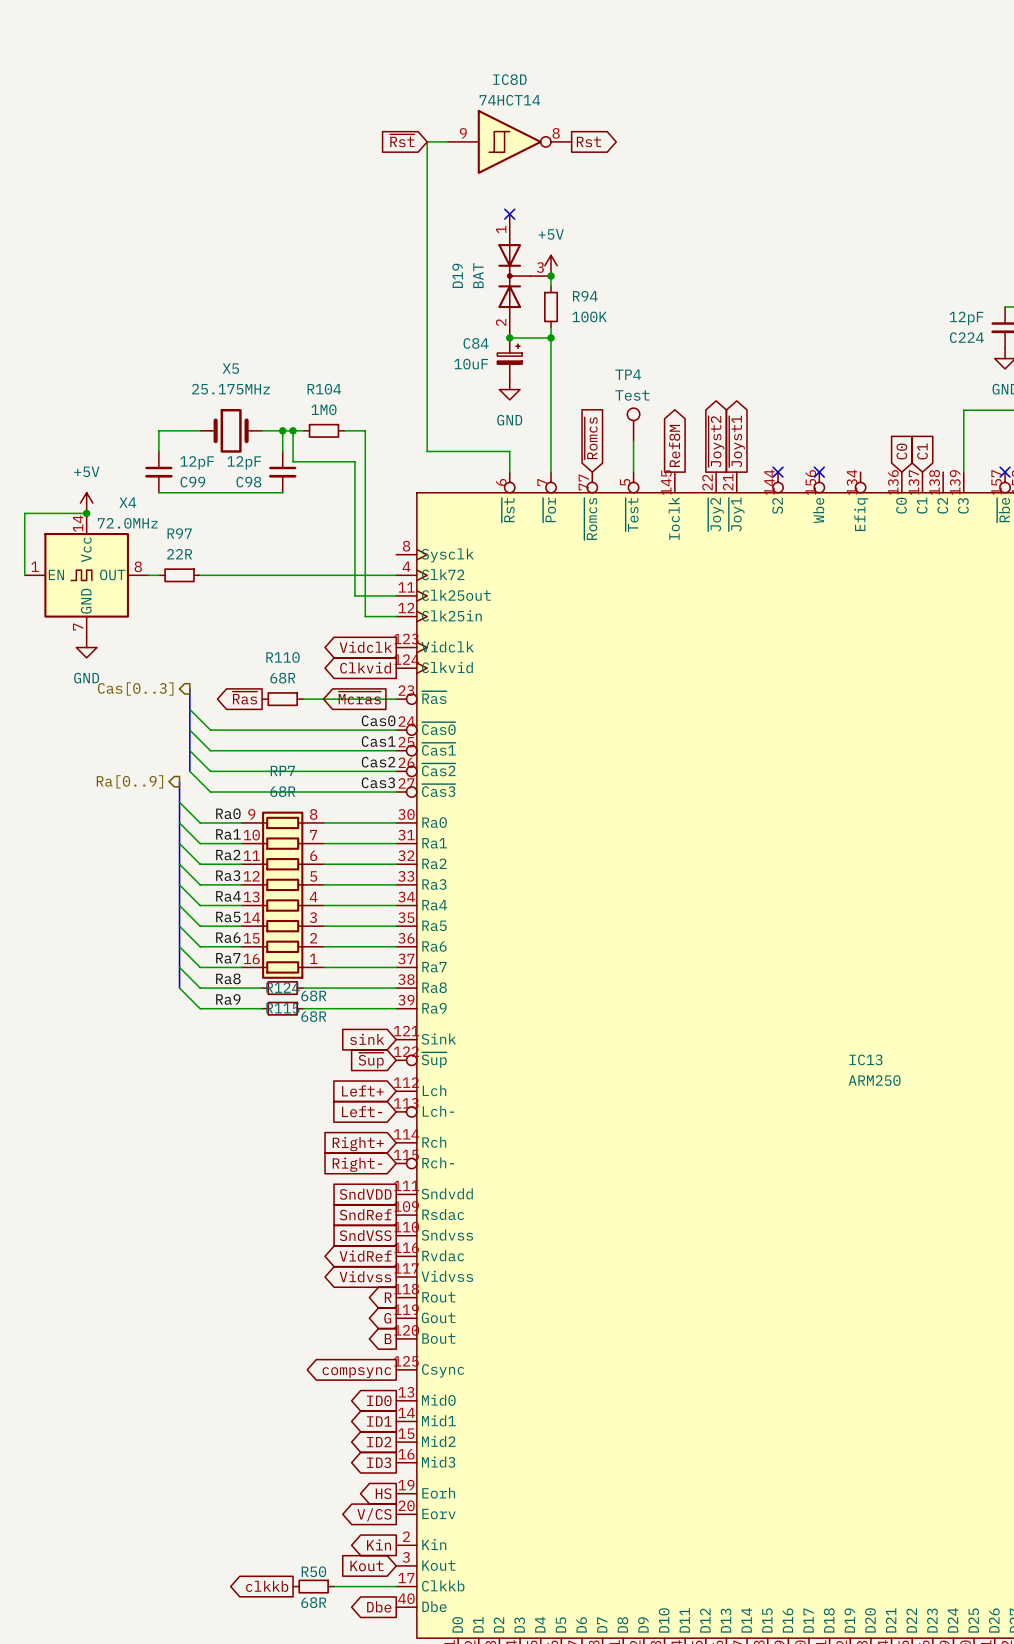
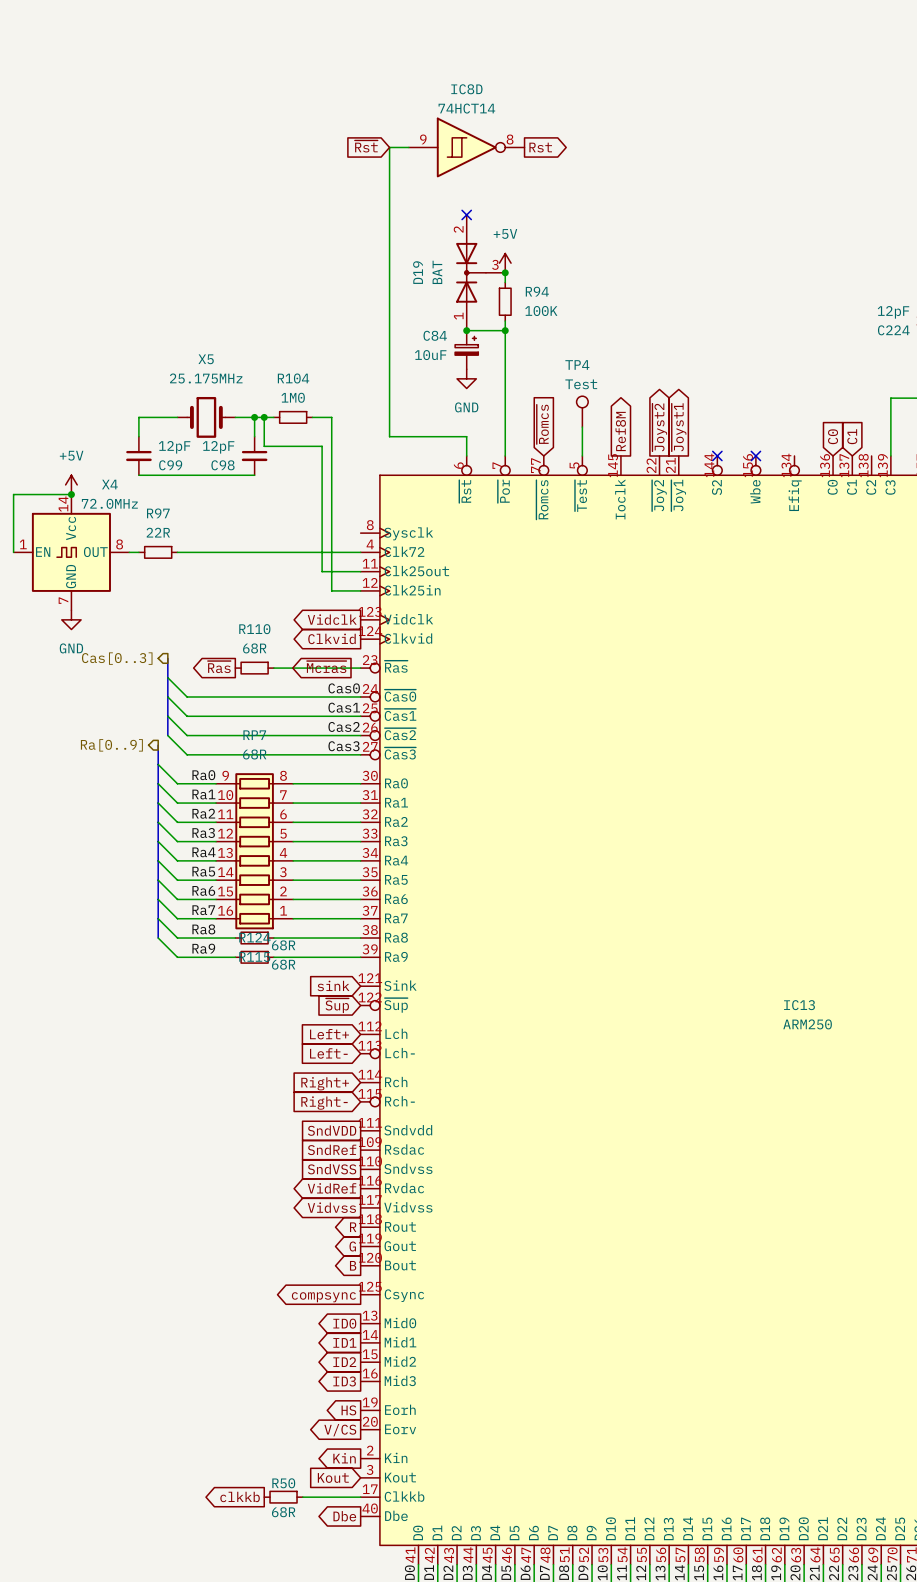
D19 flip: as is (514, 276) -> up-down (471, 272)

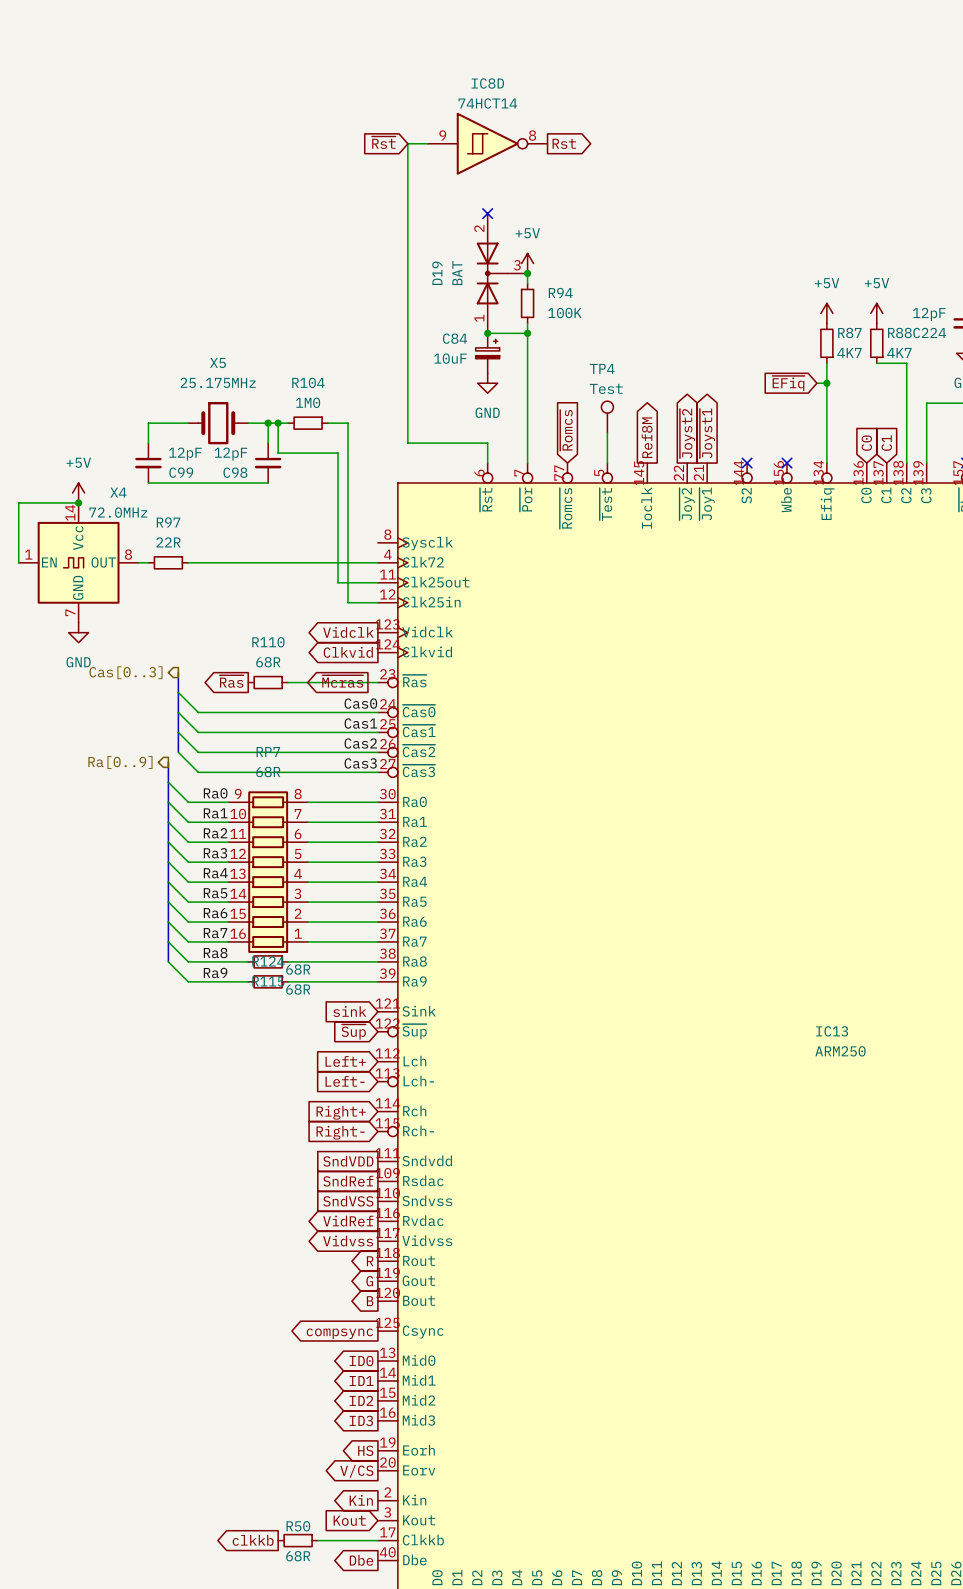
power symbol: none -> +5V (826, 313)
power symbol: none -> +5V (876, 313)
R87: none -> 4K7 (826, 343)
R88: none -> 4K7 (876, 343)
wire: none -> (826, 363) (826, 463)
wire: none -> (876, 363) (906, 363) (906, 463)
wire: none -> (816, 383) (826, 383)
junction: none -> (826, 383)
global label: none -> ~{EFiq} (788, 383)

